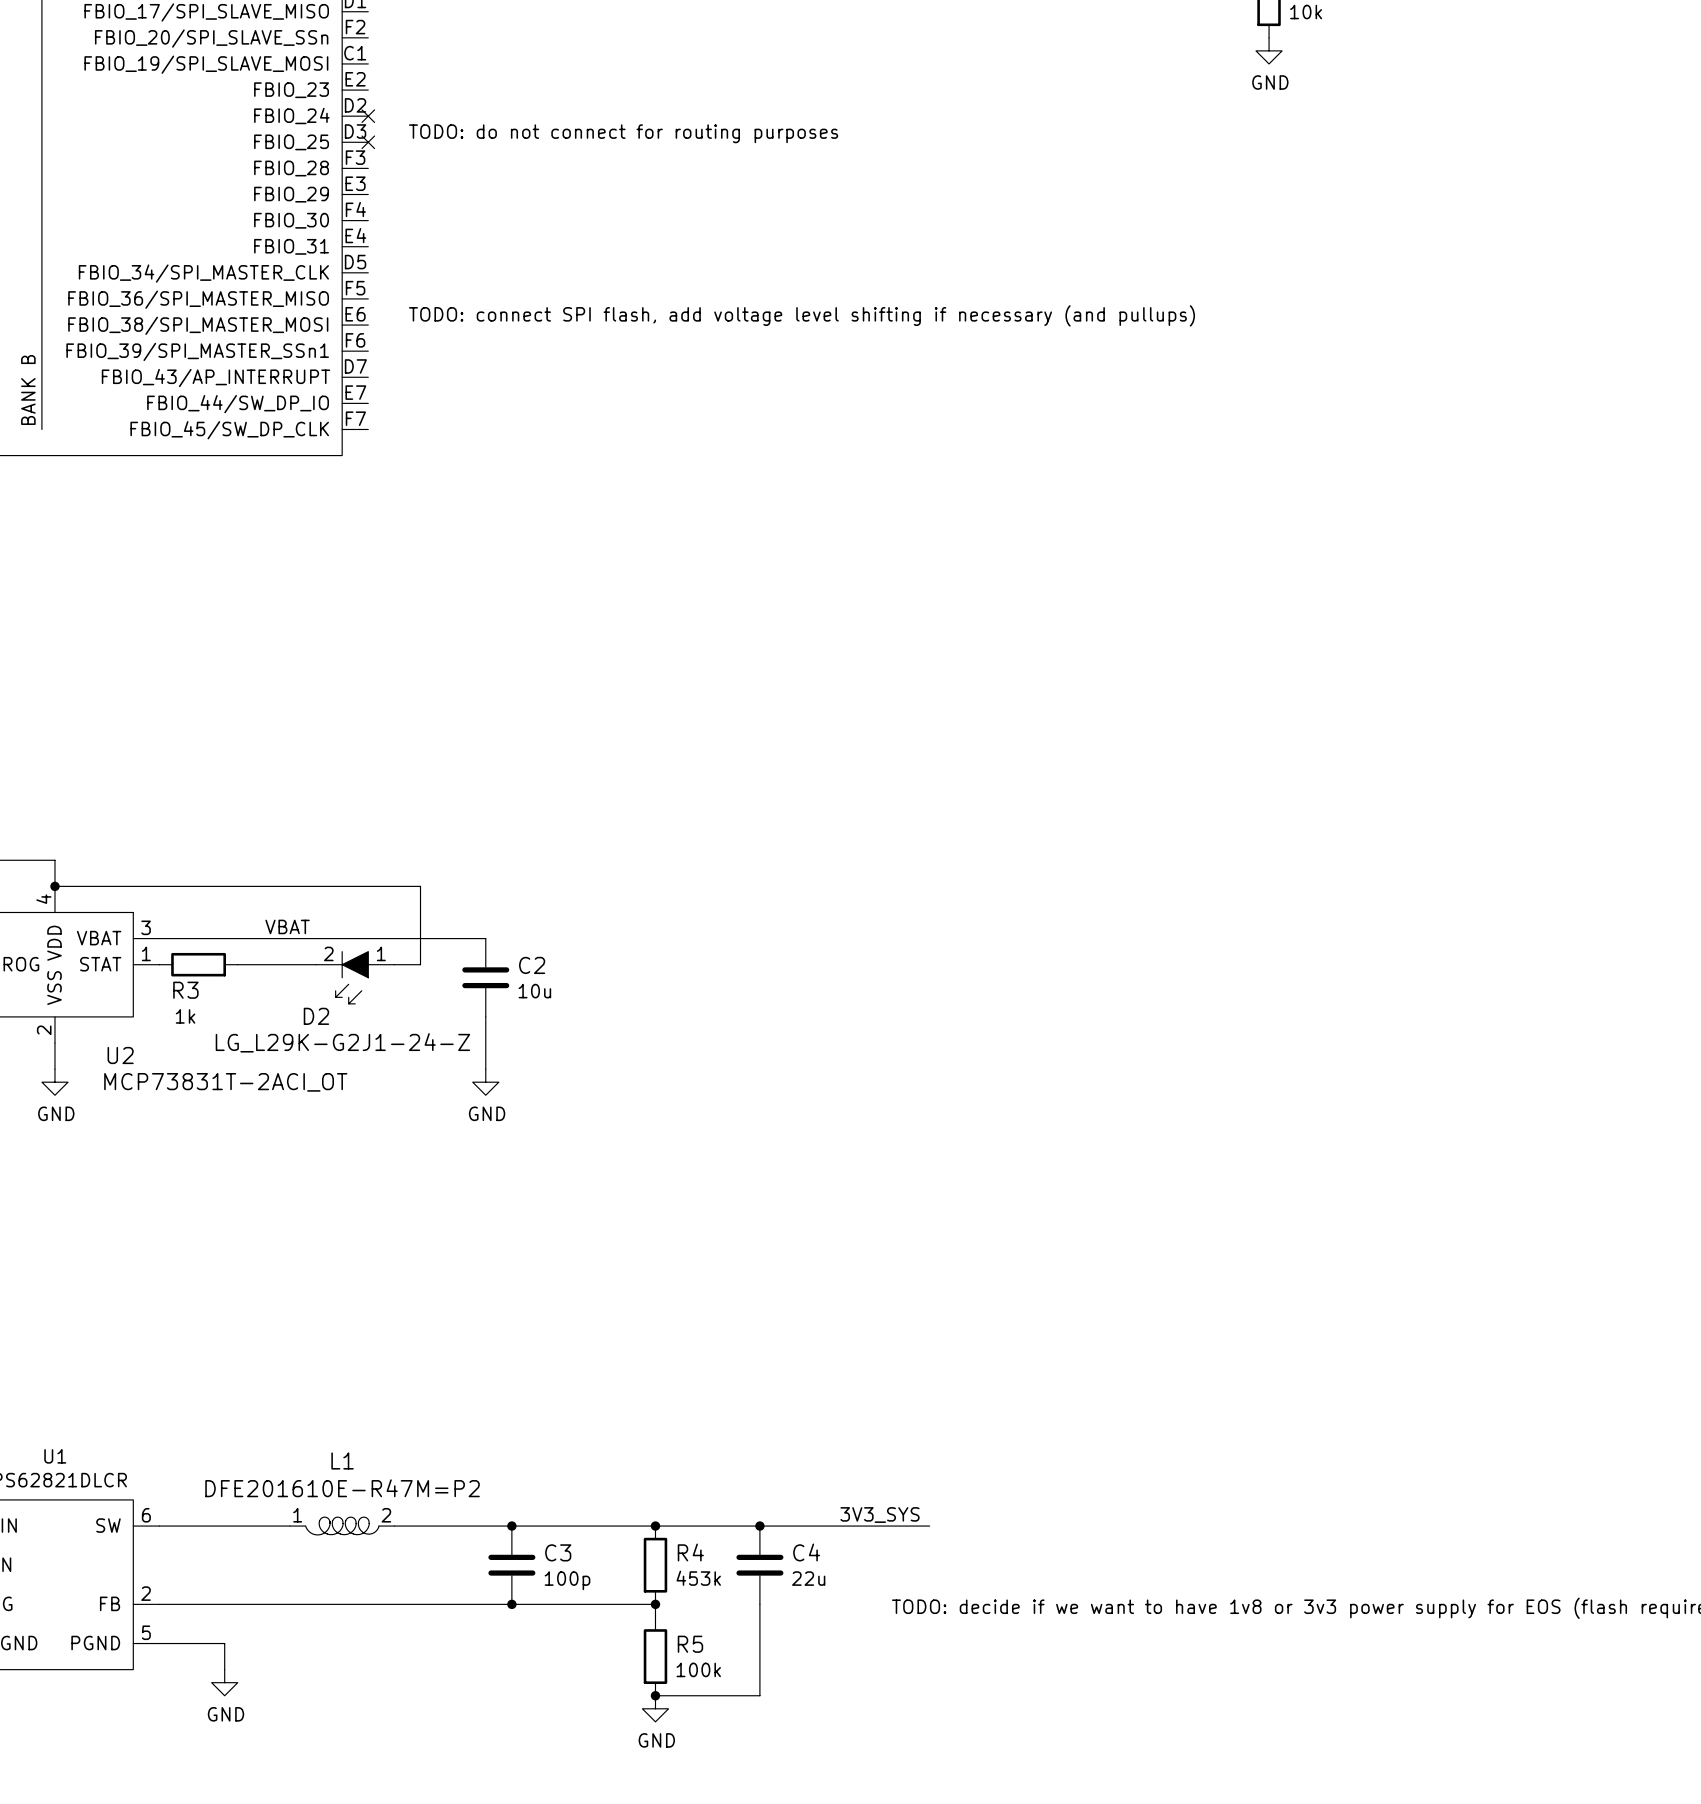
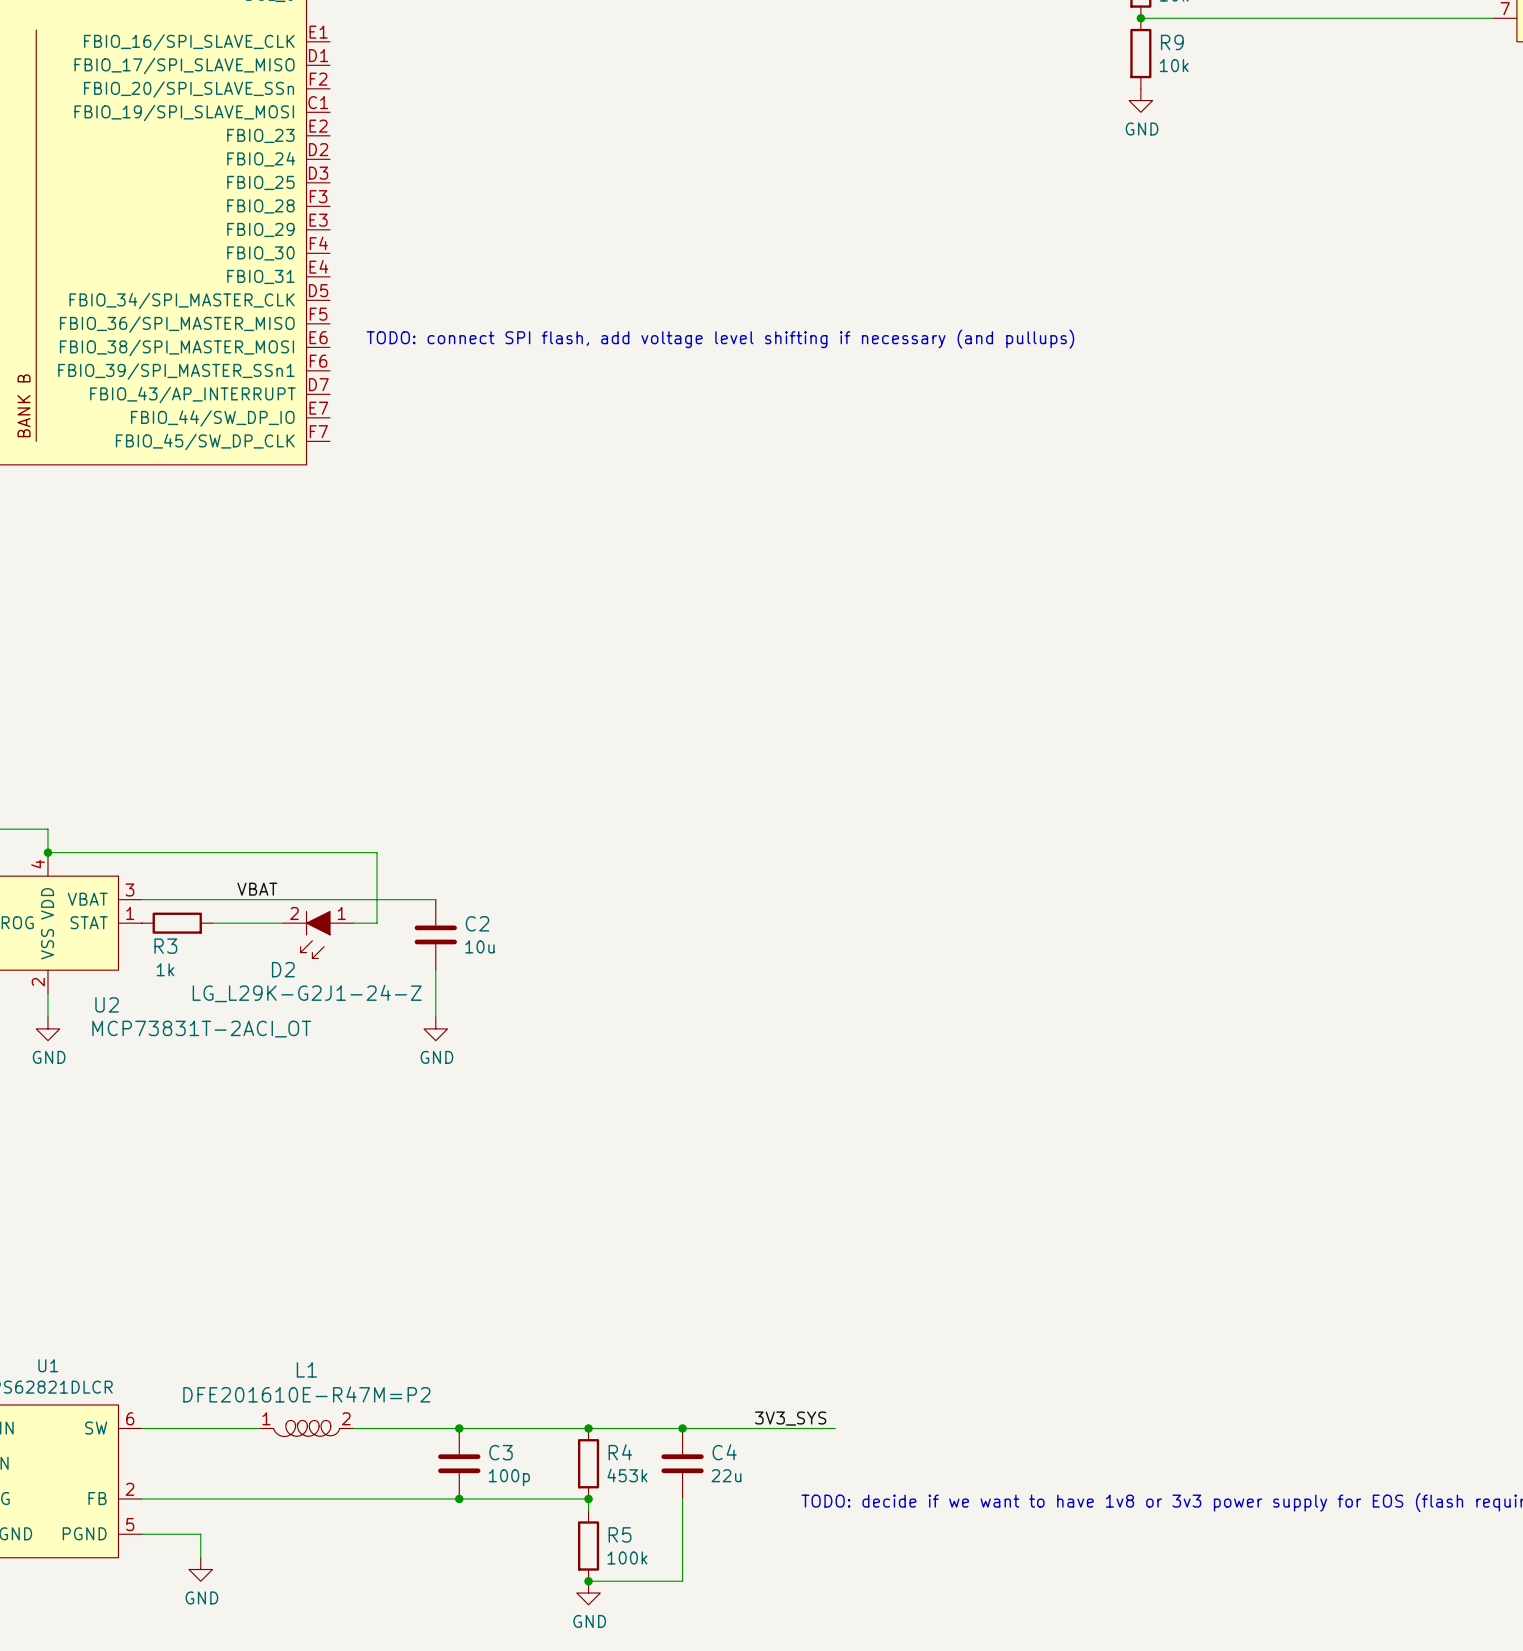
no-connect mark: (368, 116) -> none
text: TODO: do not connect for routing purposes (623, 133) -> none
no-connect mark: (368, 142) -> none

